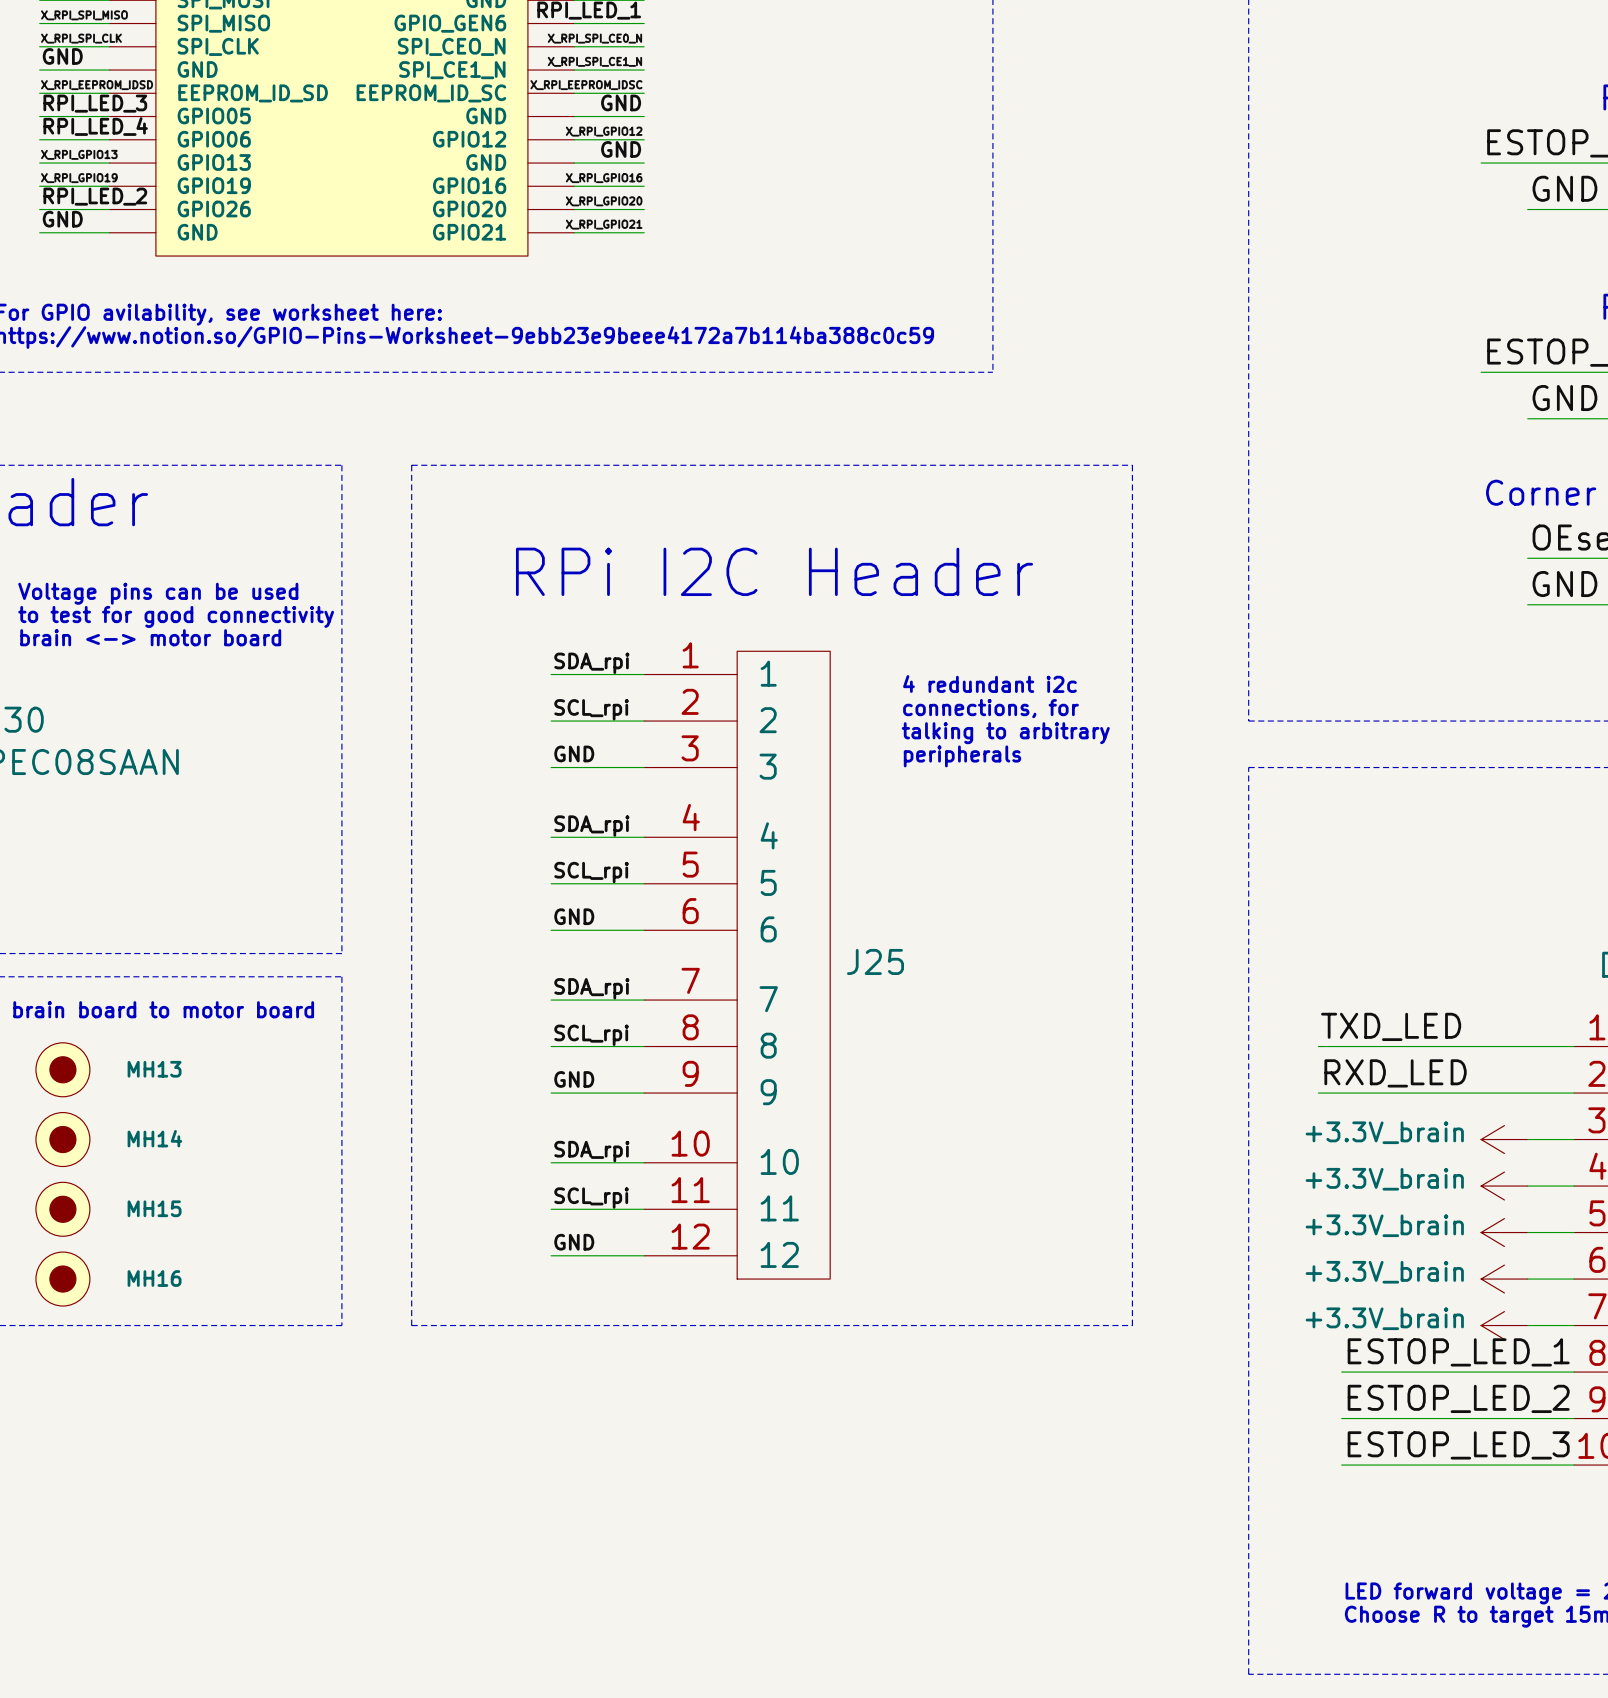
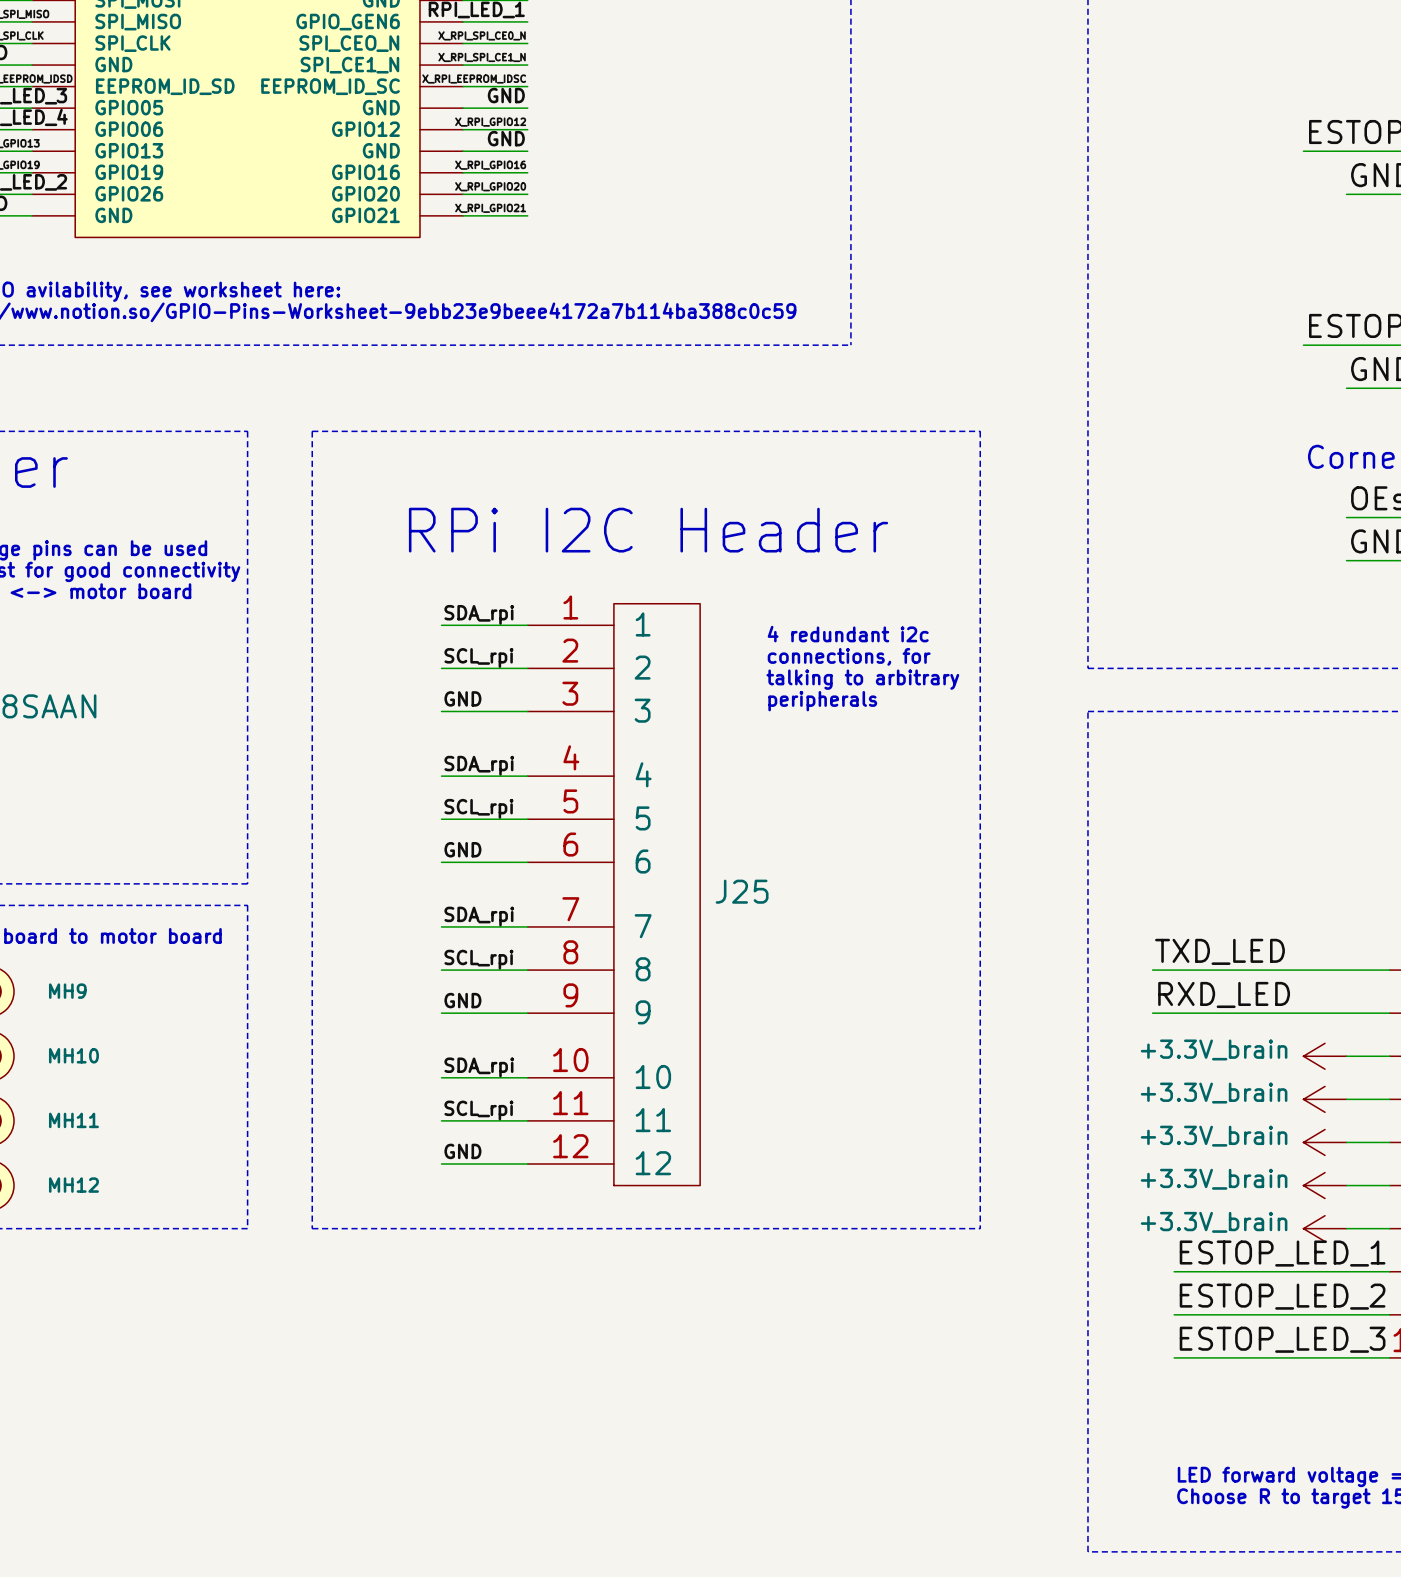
MH13 name: MH13 (154, 1069) -> MH9 (67, 991)
MH14 name: MH14 (154, 1138) -> MH10 (73, 1055)
MH15 name: MH15 (154, 1208) -> MH11 (73, 1120)
MH16 name: MH16 (154, 1278) -> MH12 (73, 1185)

